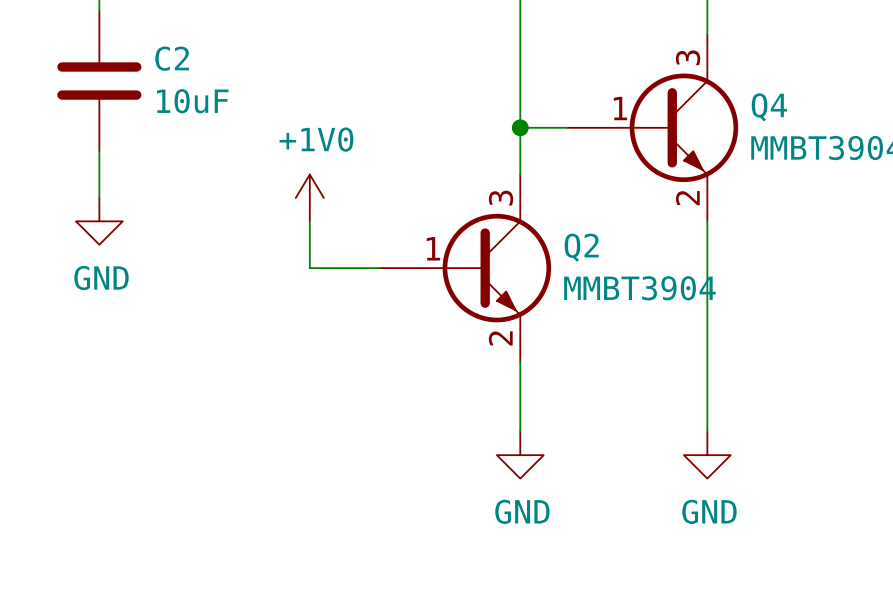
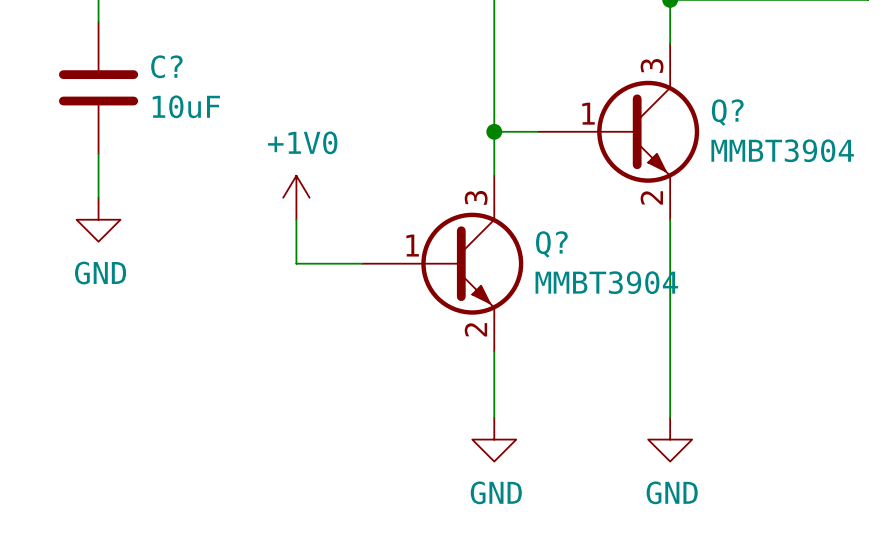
C2 name: C2 (172, 58) -> C? (166, 66)
Q4 name: Q4 (769, 107) -> Q? (727, 112)
Q2 name: Q2 (581, 247) -> Q? (551, 244)

